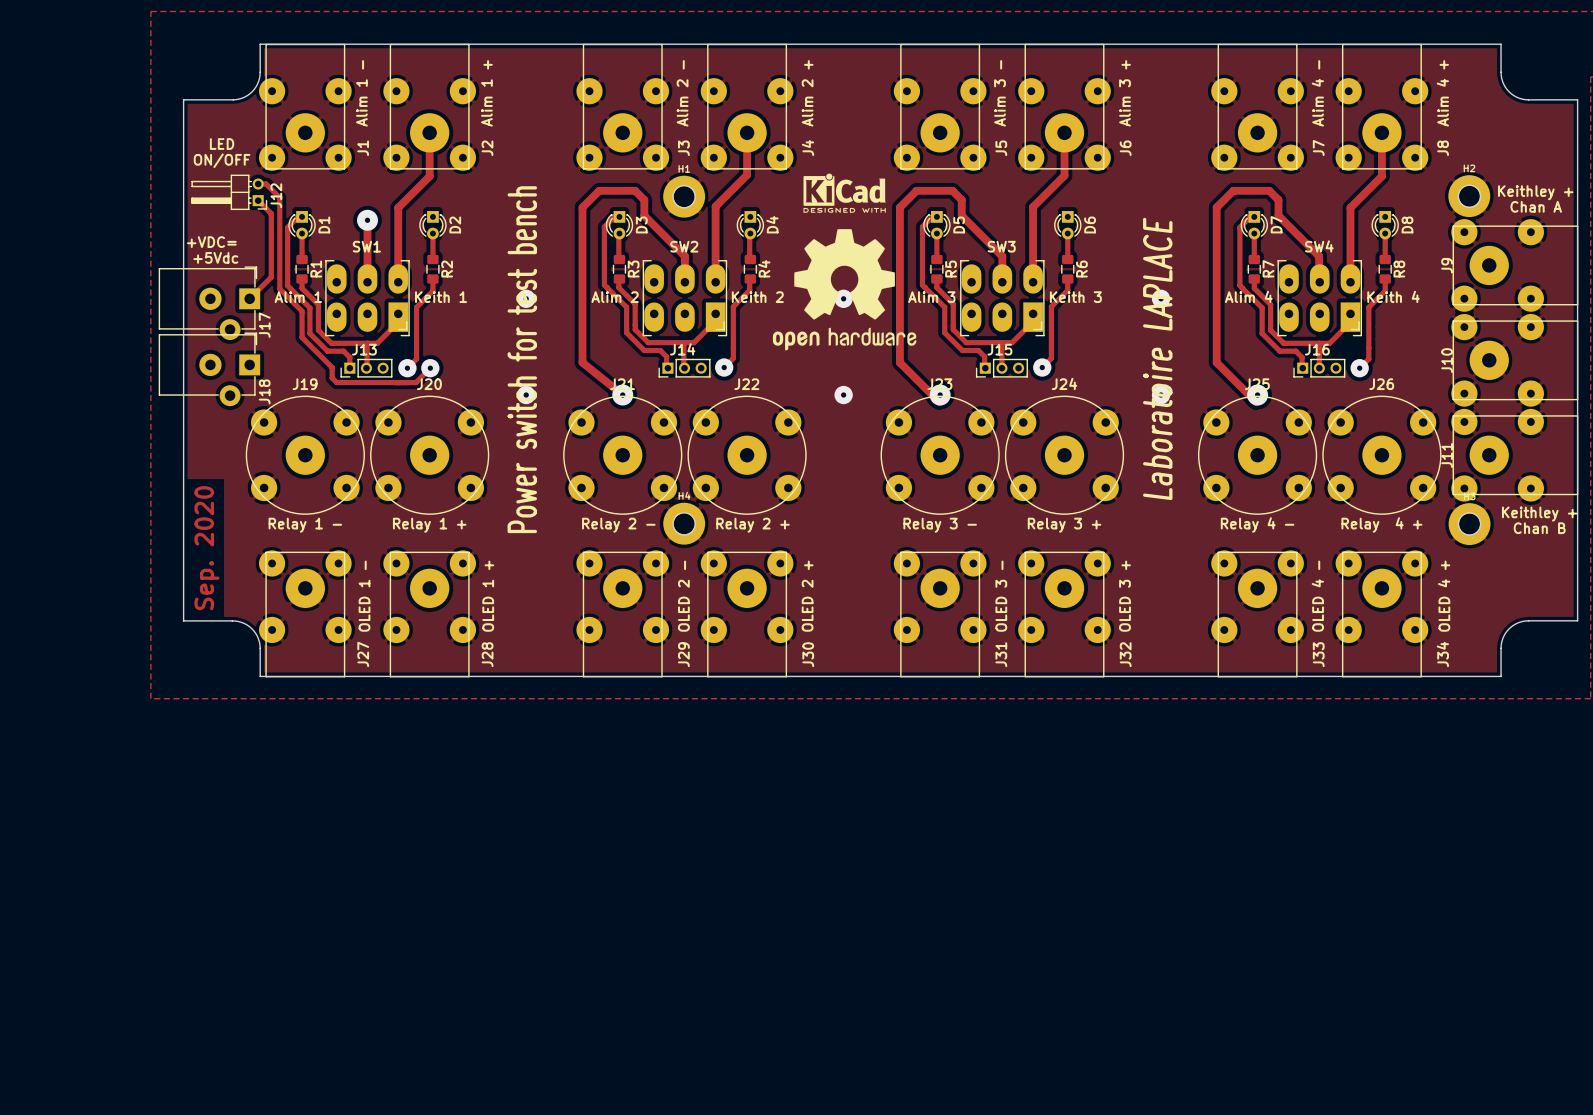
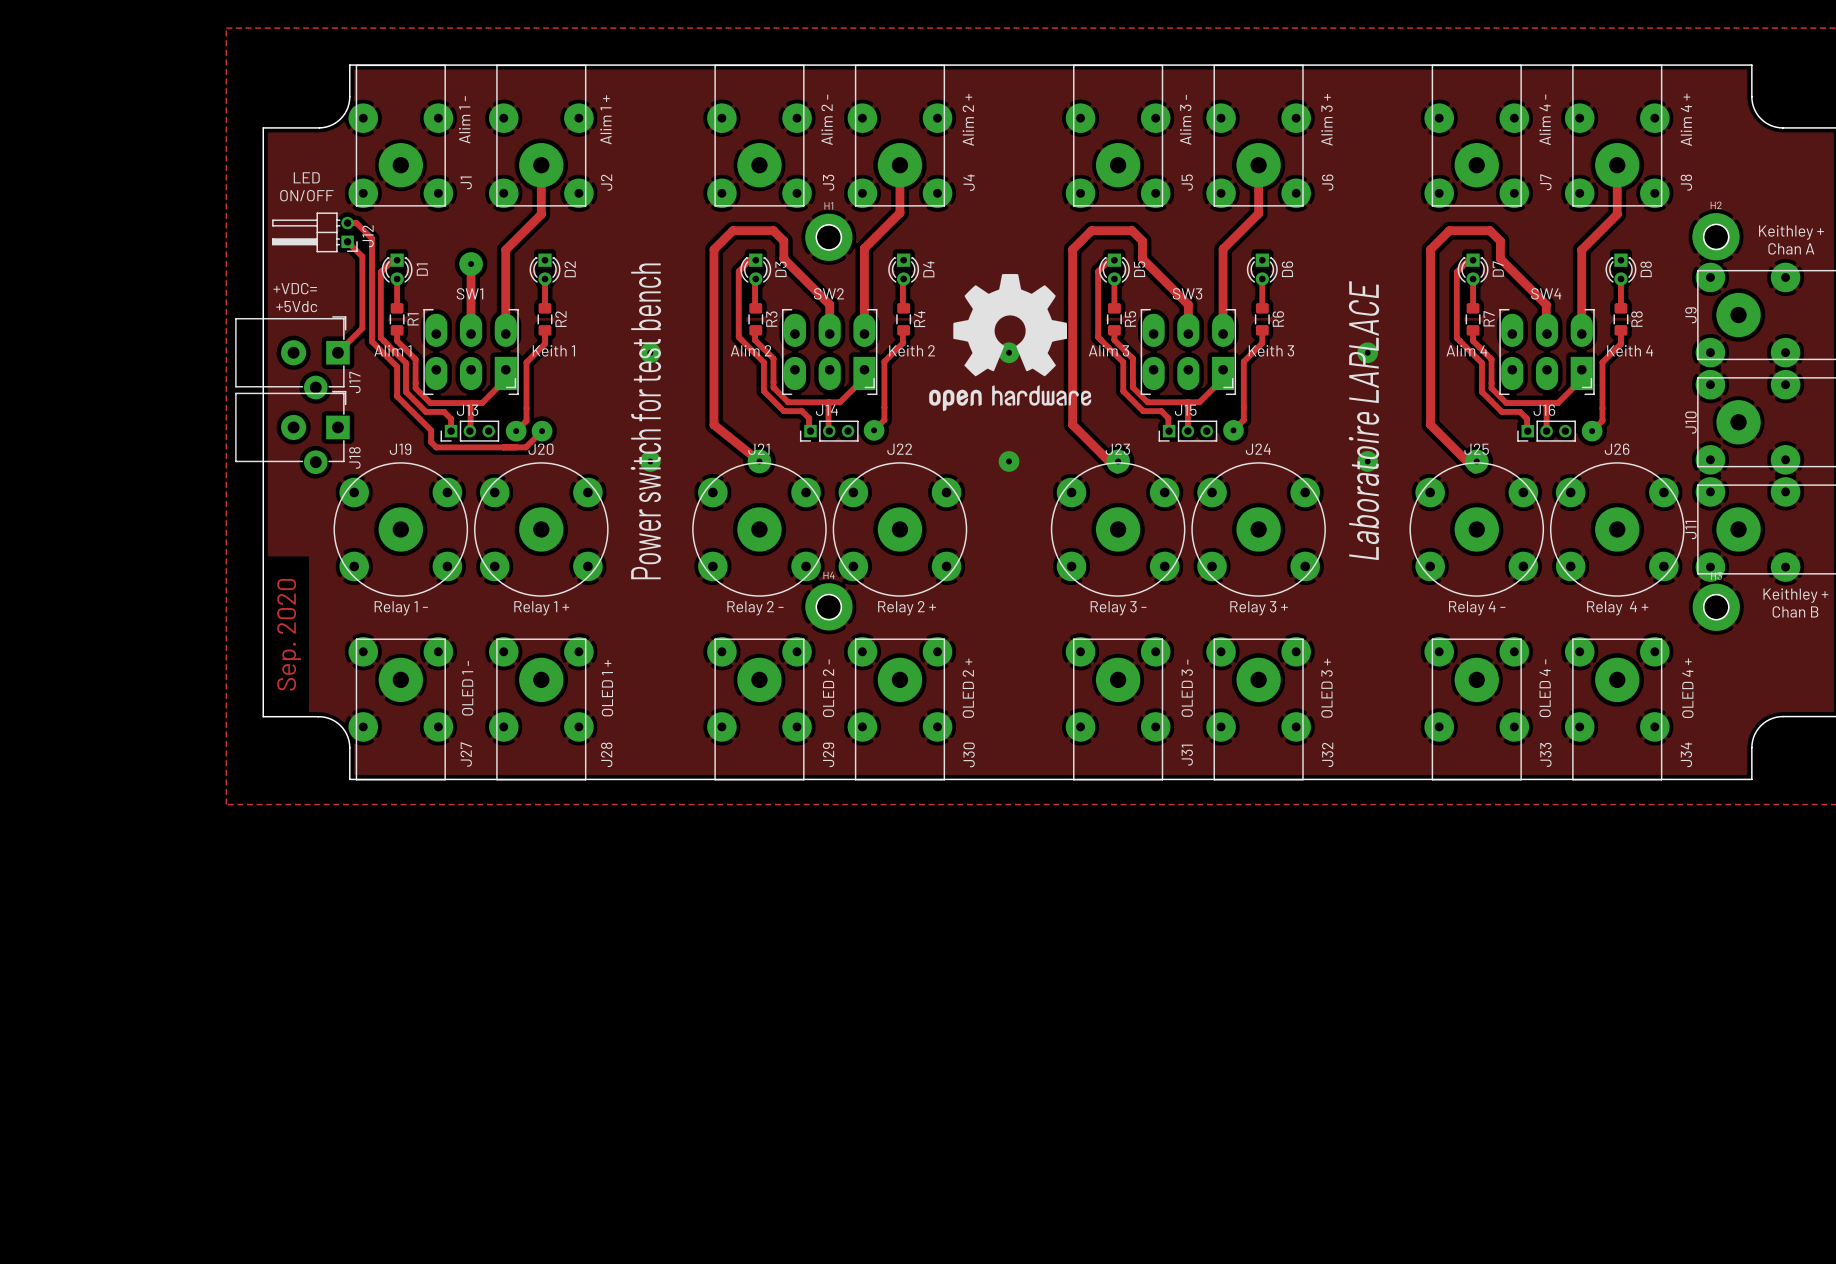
drawing: [803, 173, 886, 213] -> none

